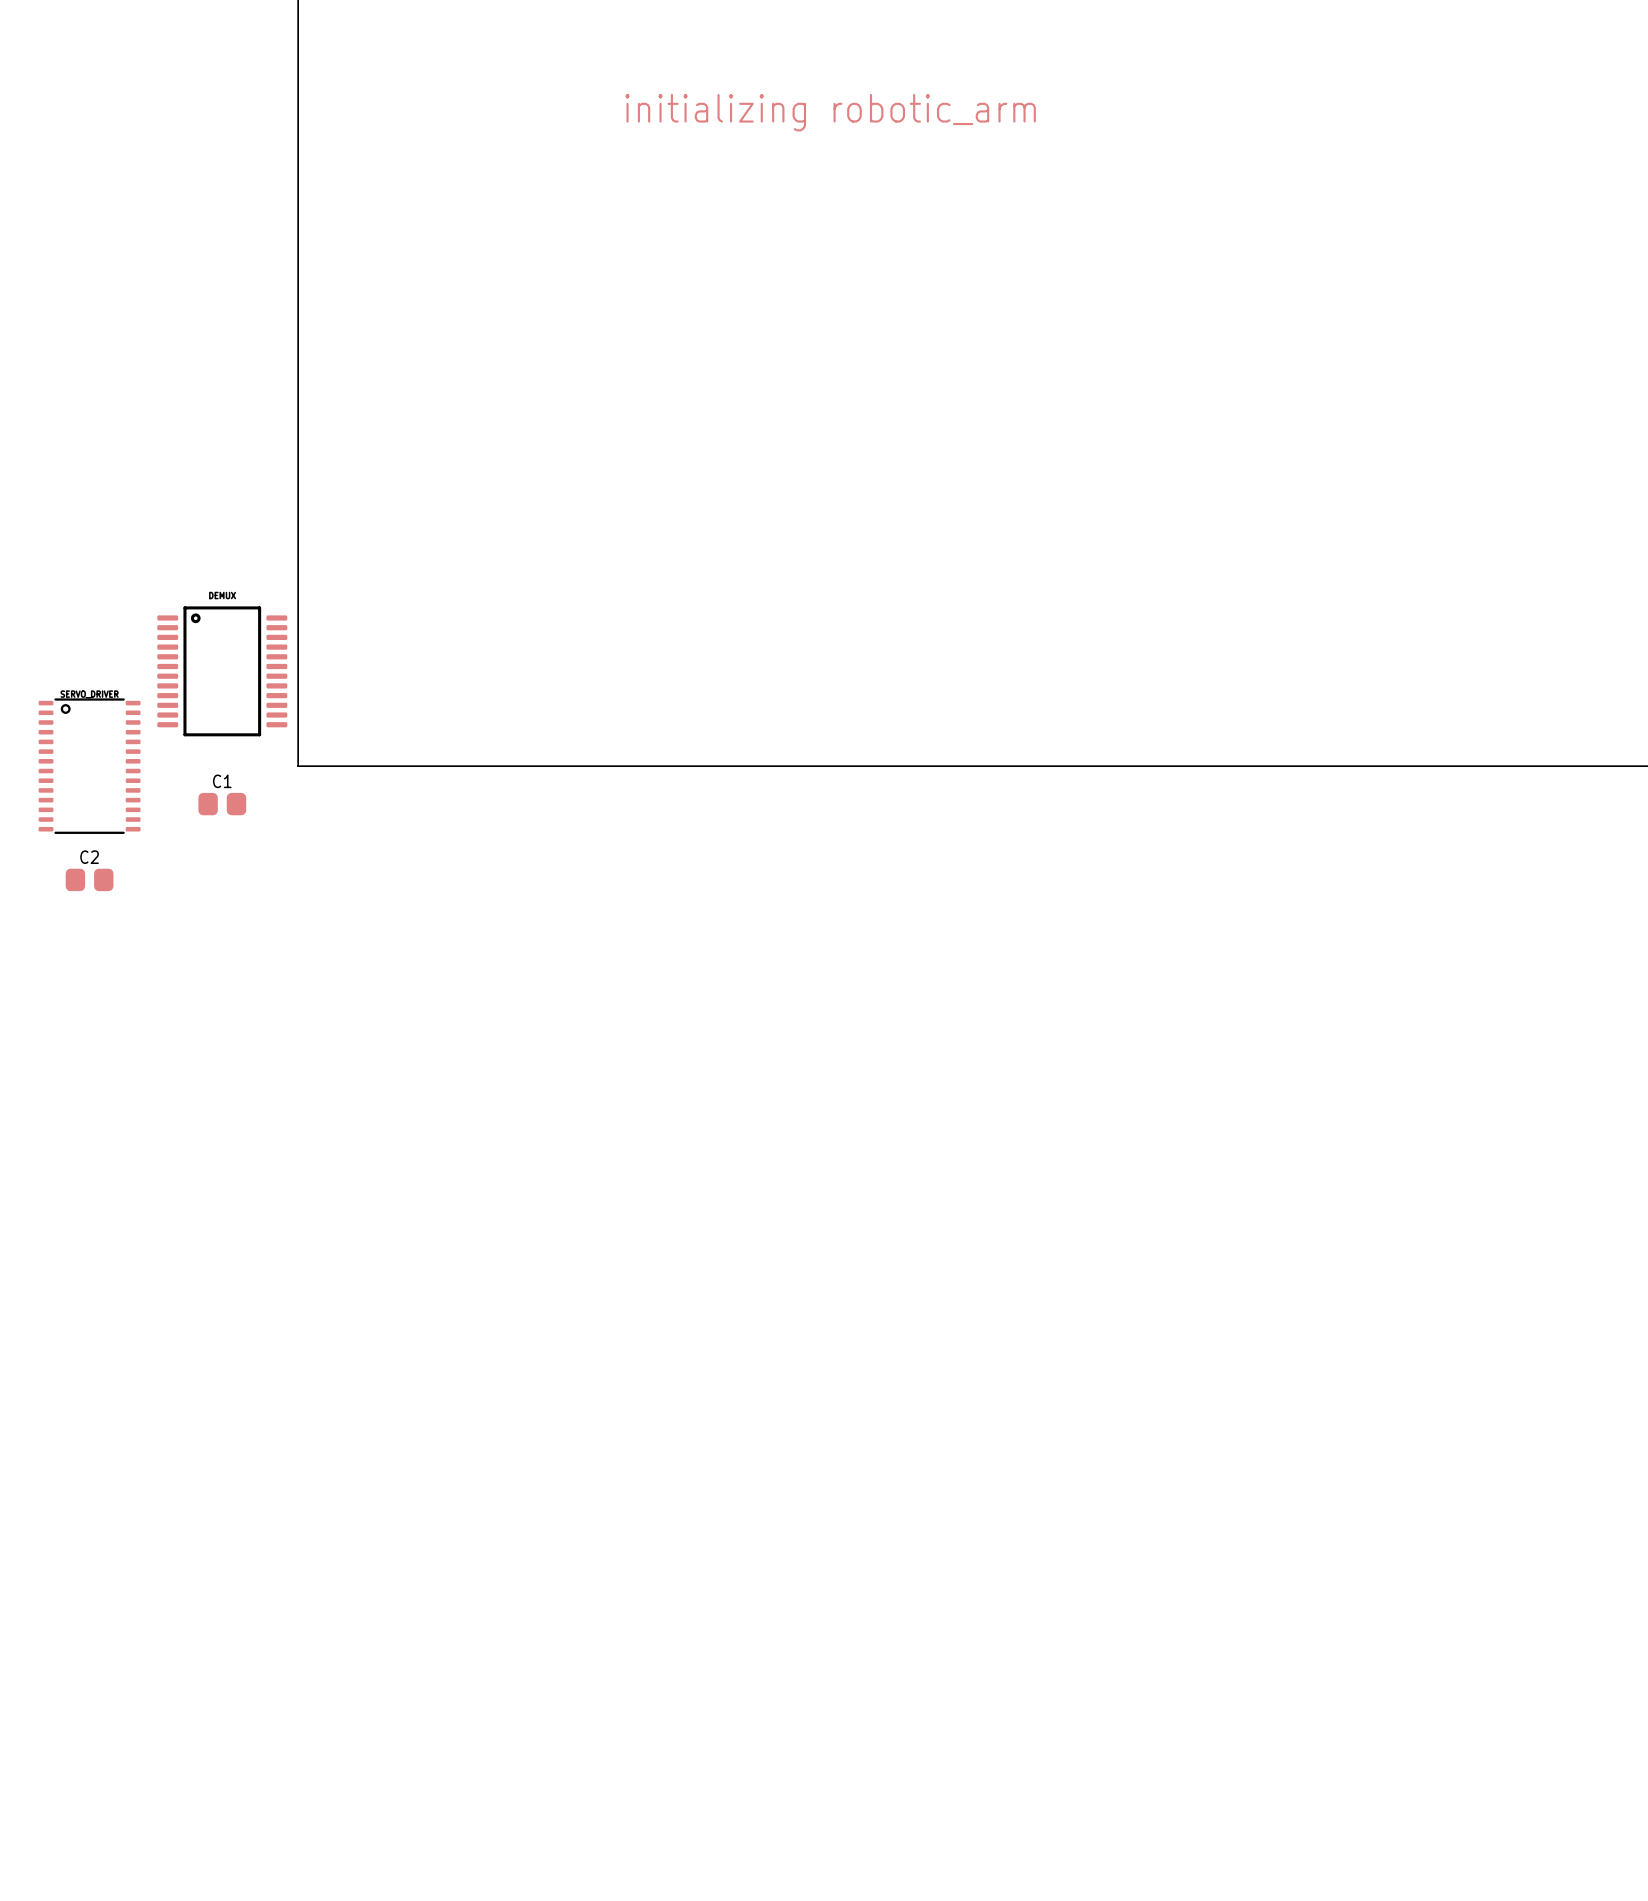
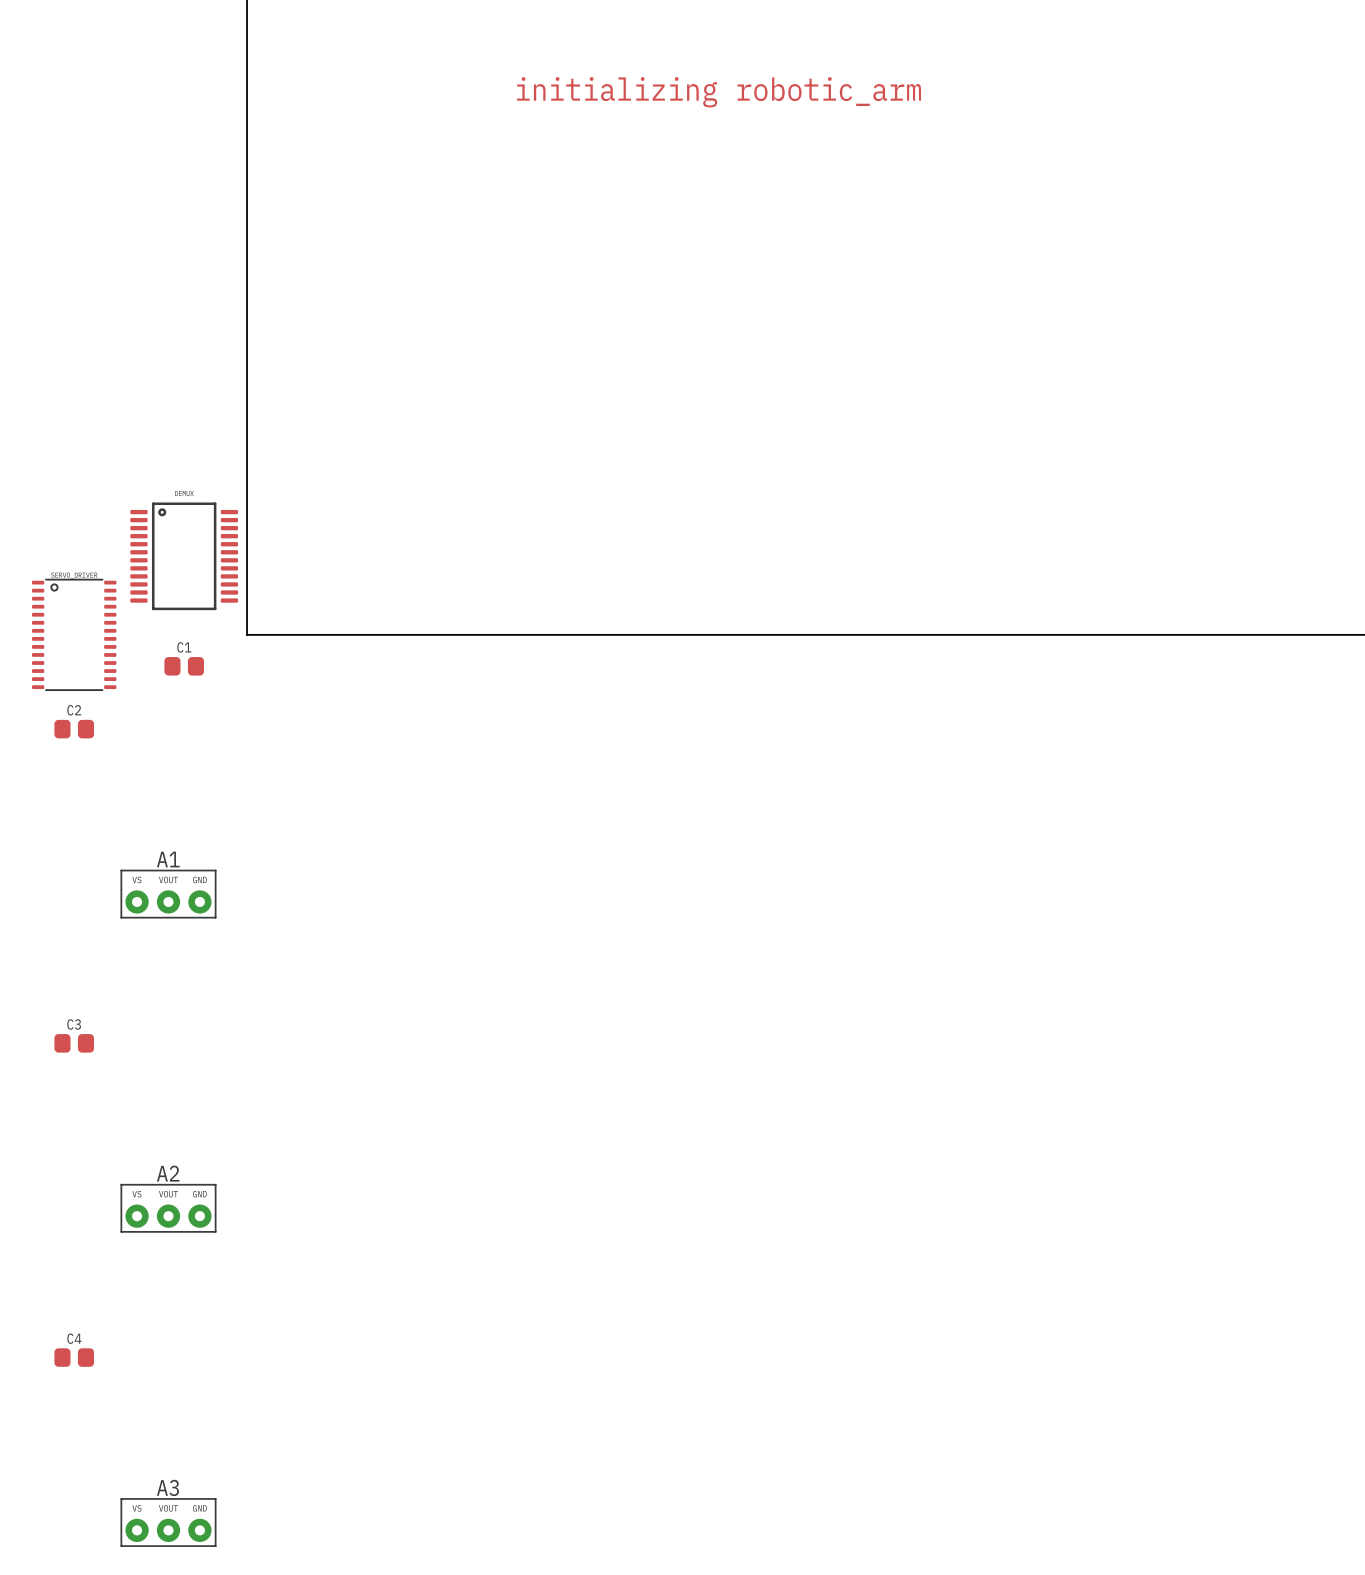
A1: none -> (168, 894)
C3: none -> (74, 1043)
A2: none -> (168, 1208)
C4: none -> (74, 1357)
A3: none -> (168, 1522)

